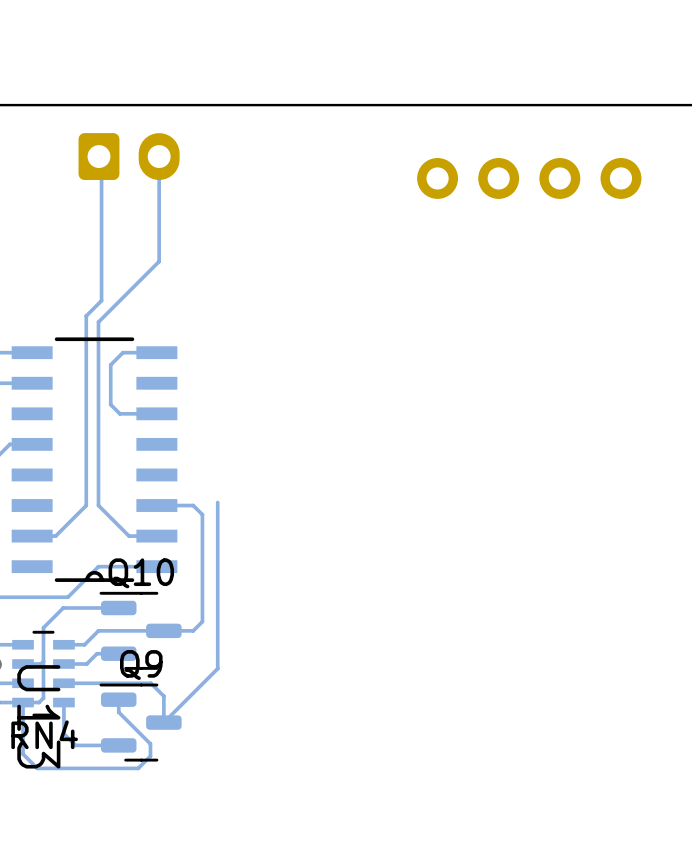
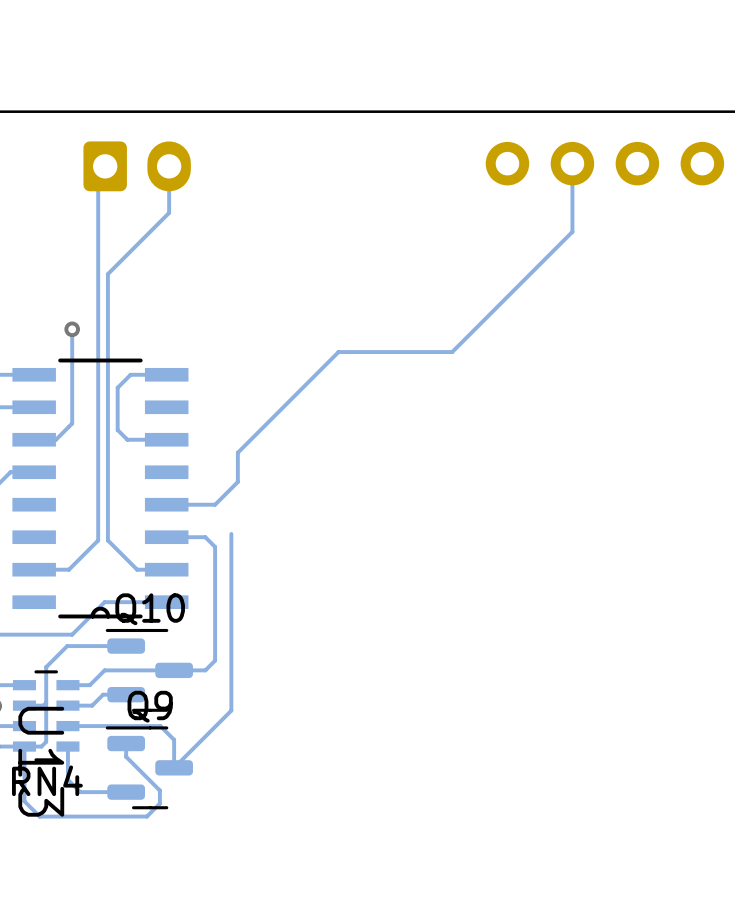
track: none -> (572, 163) (572, 231) (452, 352) (338, 352) (237, 452) (237, 481) (215, 504) (166, 504)
track: (98, 156) (101, 159) (101, 257) -> (169, 212) (107, 274)
track: none -> (105, 166) (98, 173) (98, 540) (68, 569) (59, 569)
part position: (529, 178) -> (604, 163)
track: (159, 200) (159, 261) (98, 322) (98, 505) (101, 508) -> none
track: (101, 300) (86, 316) (86, 505) (55, 536) -> (107, 319) (107, 540)
track: none -> (72, 329) (72, 423) (55, 439) (34, 439)
via: none -> (72, 329)

